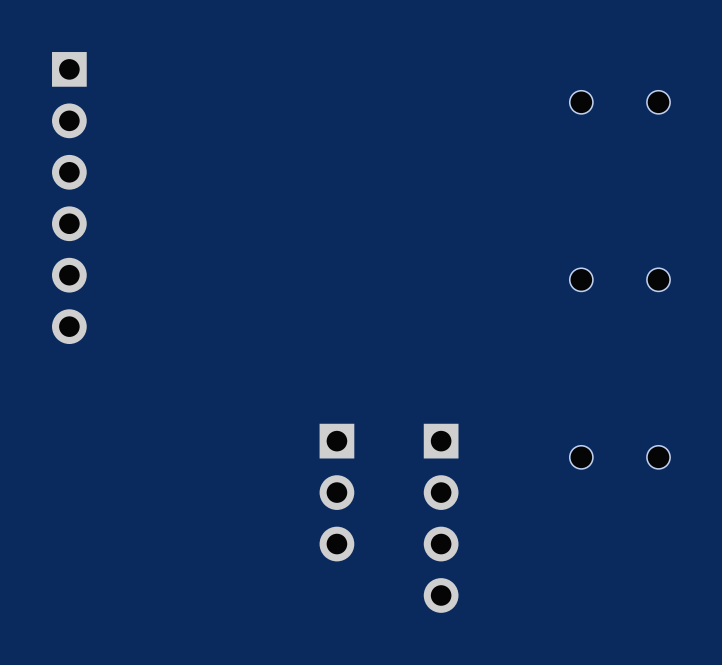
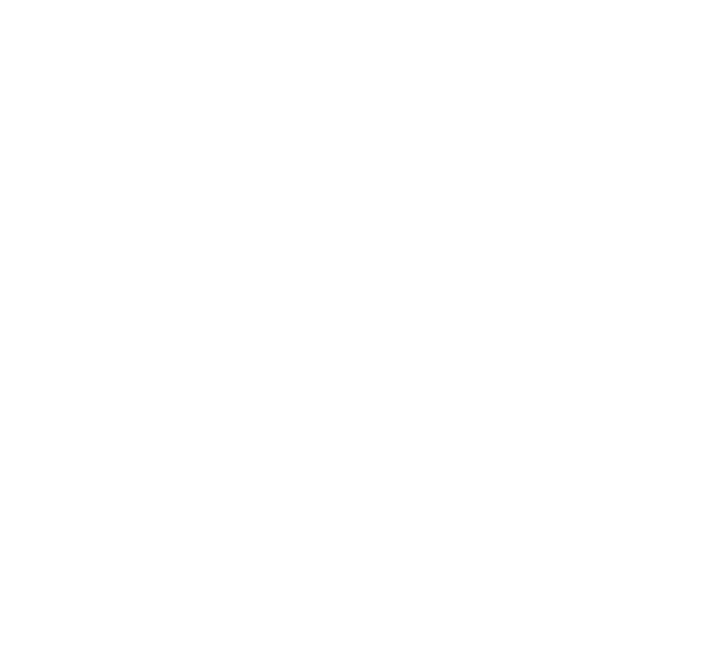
part: (619, 102) -> none
part: (69, 198) -> none
part: (619, 279) -> none
part: (619, 457) -> none
part: (336, 492) -> none
part: (441, 518) -> none

